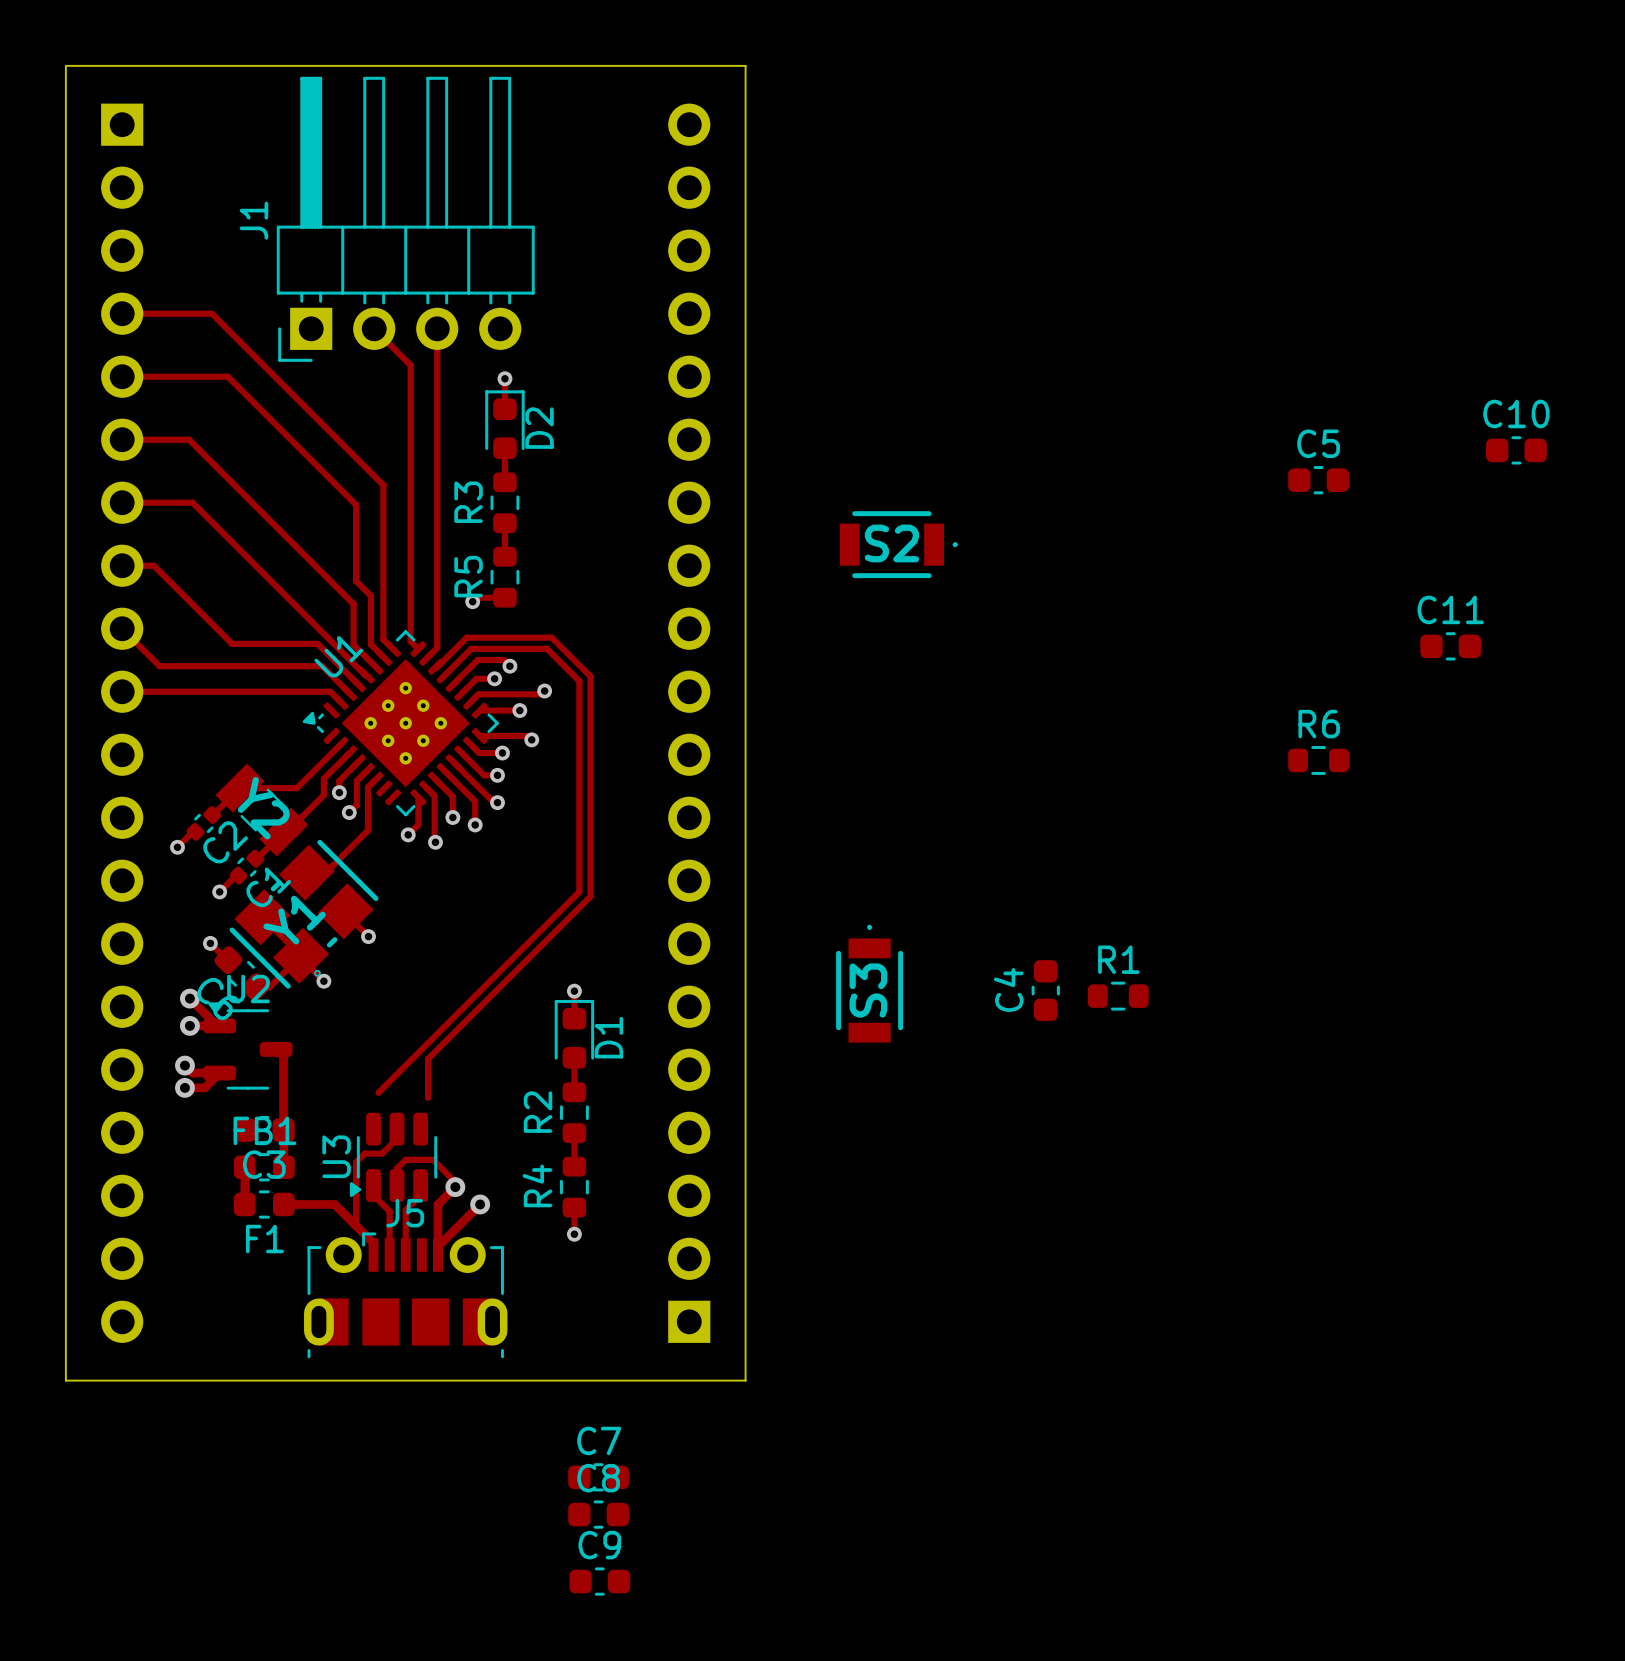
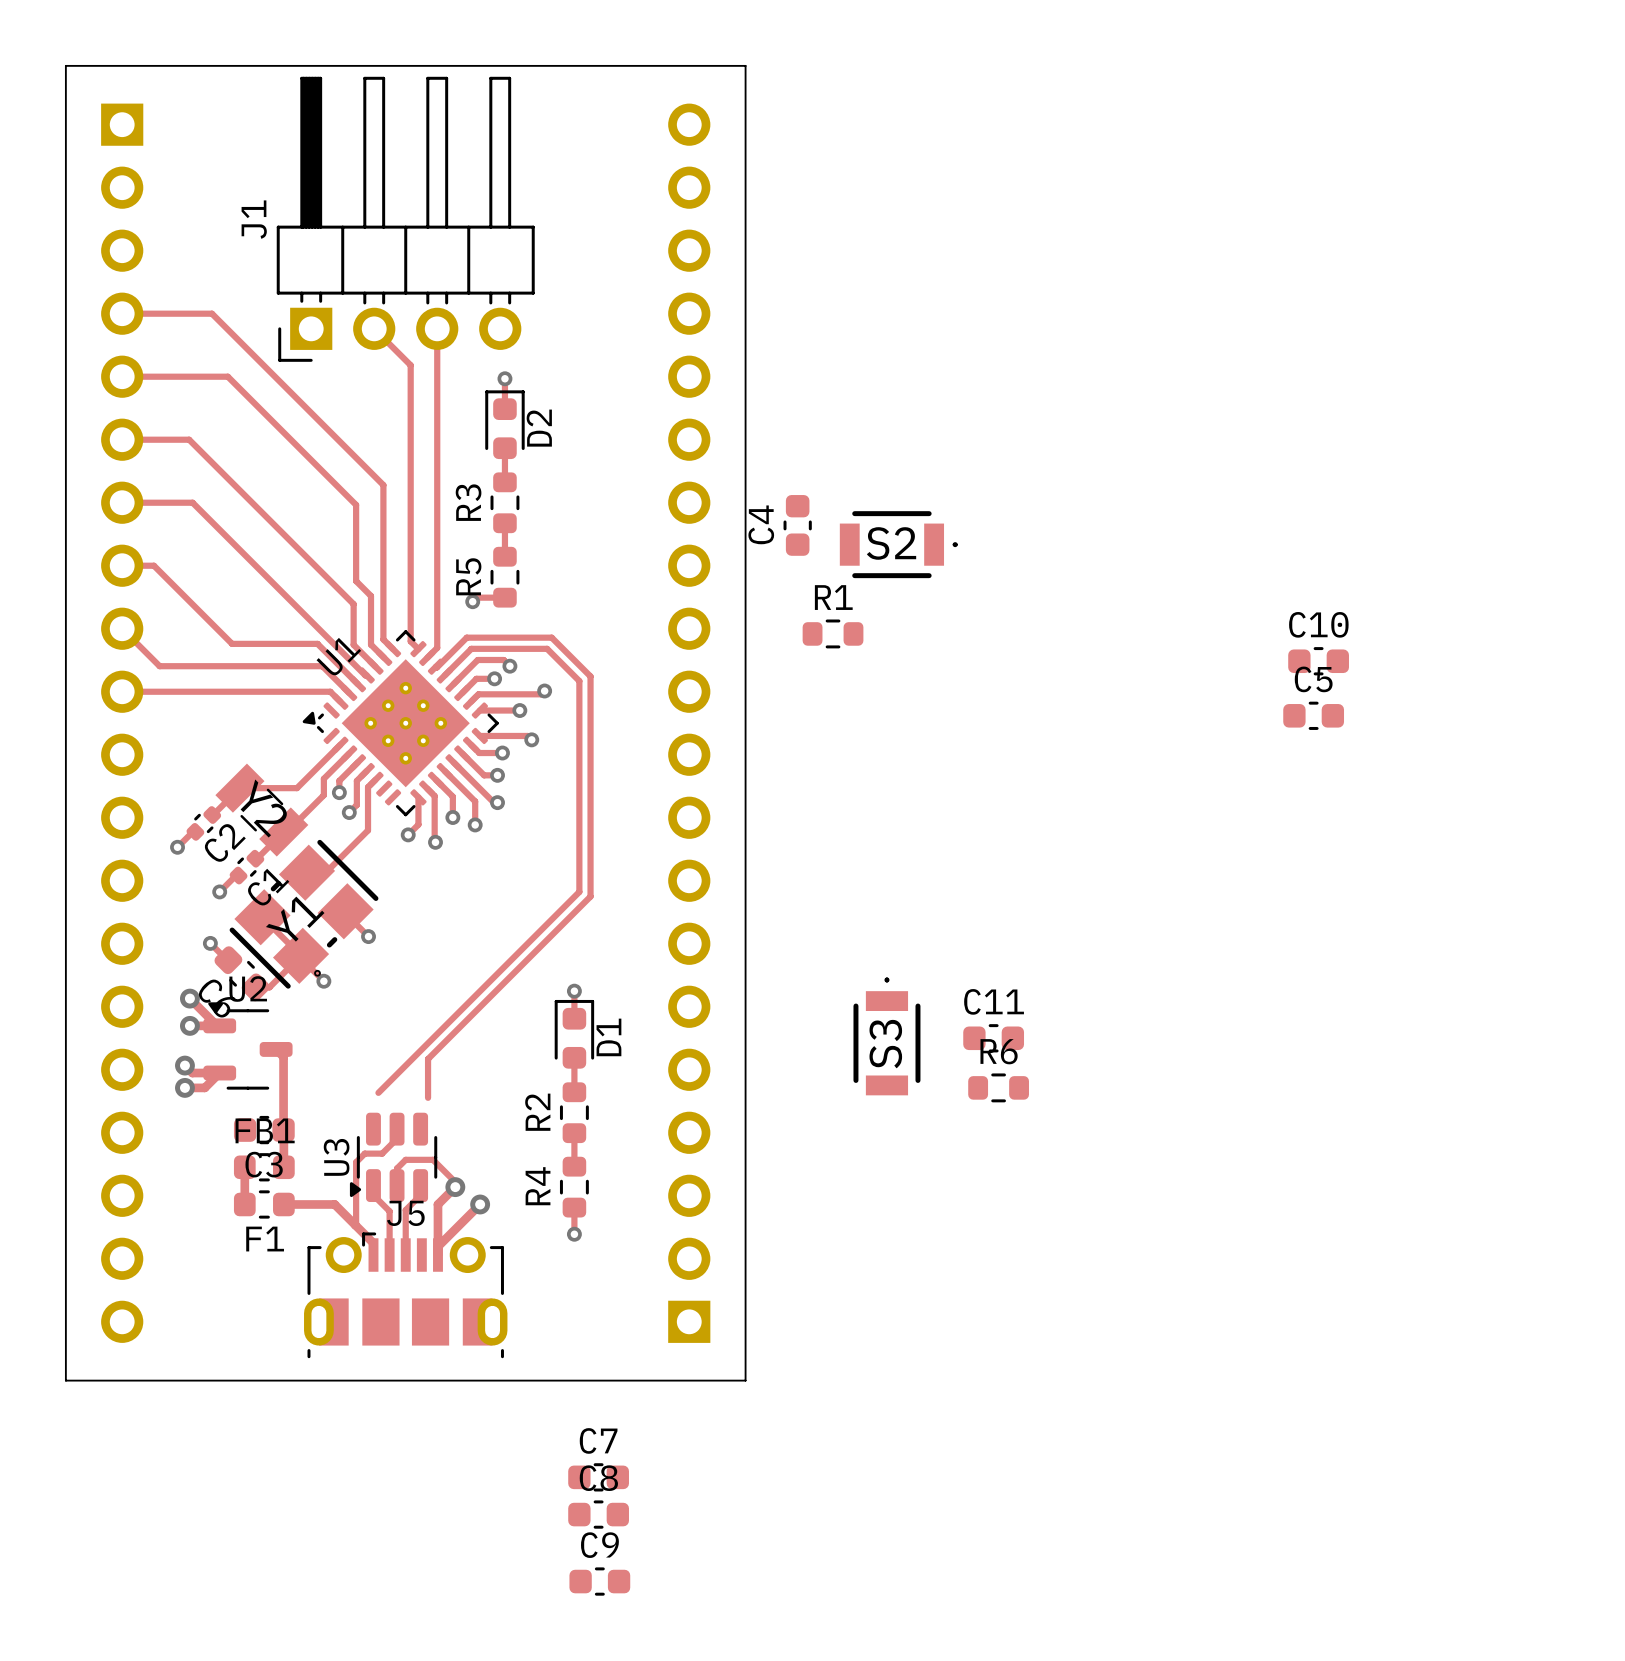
C10 position: (1516, 450) -> (1318, 661)
C5 position: (1318, 480) -> (1313, 715)
C11 position: (1450, 646) -> (993, 1038)
R6 position: (1318, 760) -> (998, 1087)
S3 position: (869, 983) -> (886, 1036)
C4 position: (1045, 990) -> (797, 525)
R1 position: (1118, 996) -> (833, 633)

